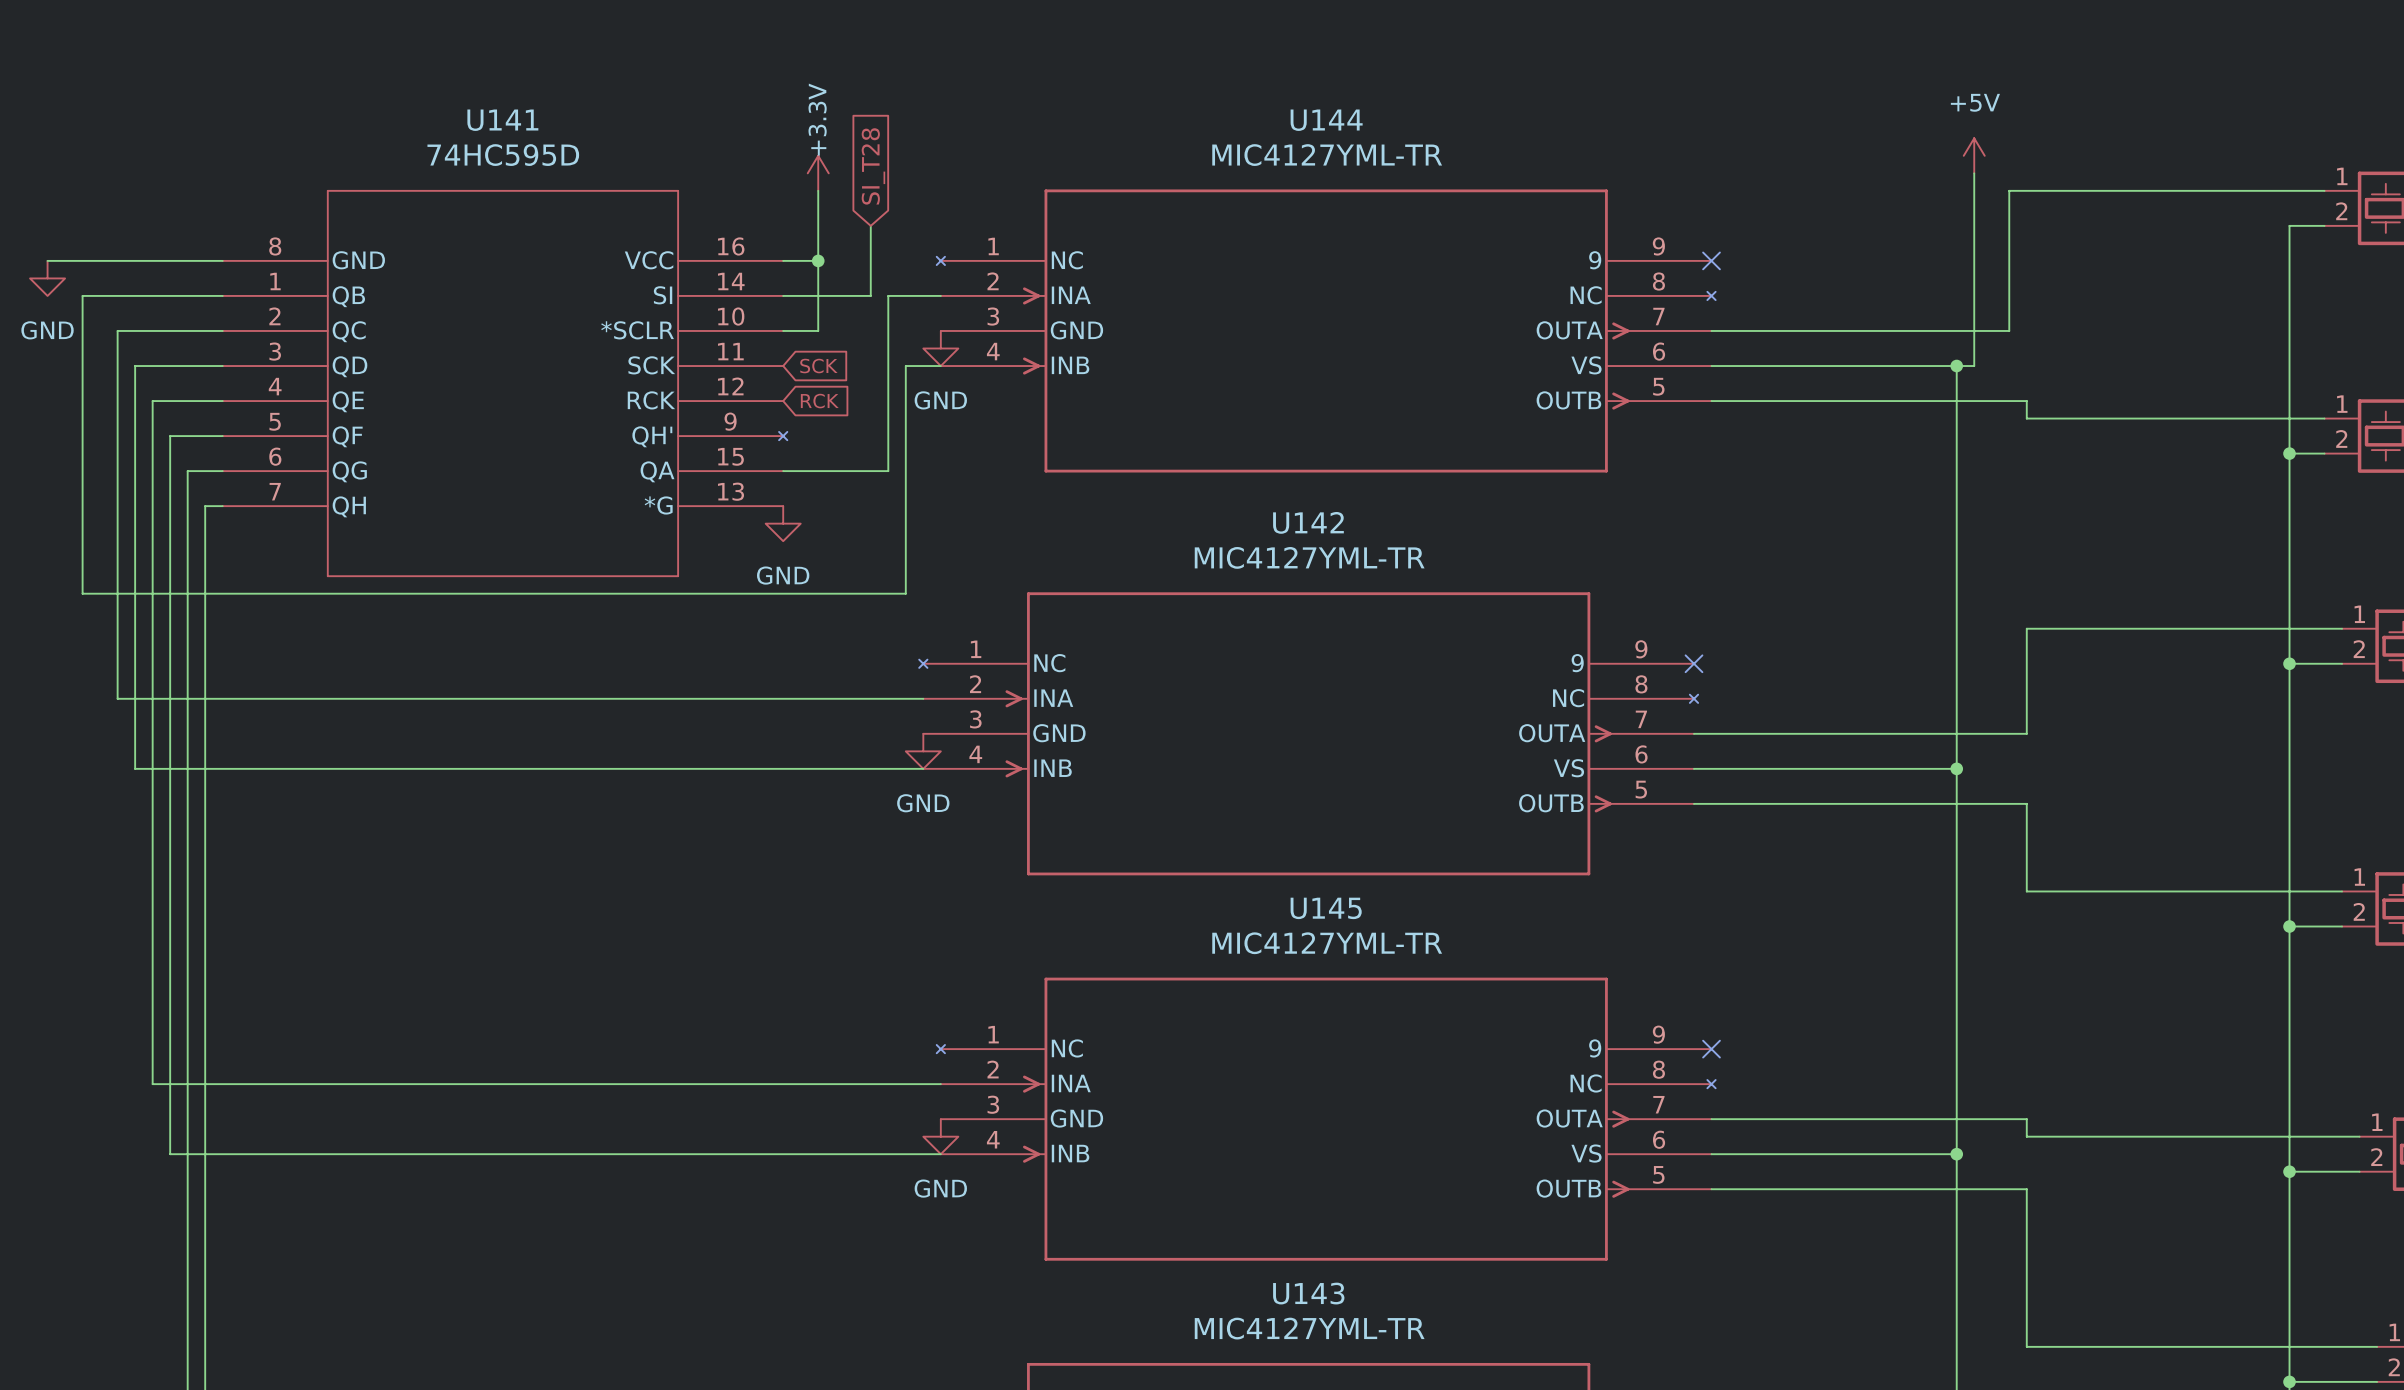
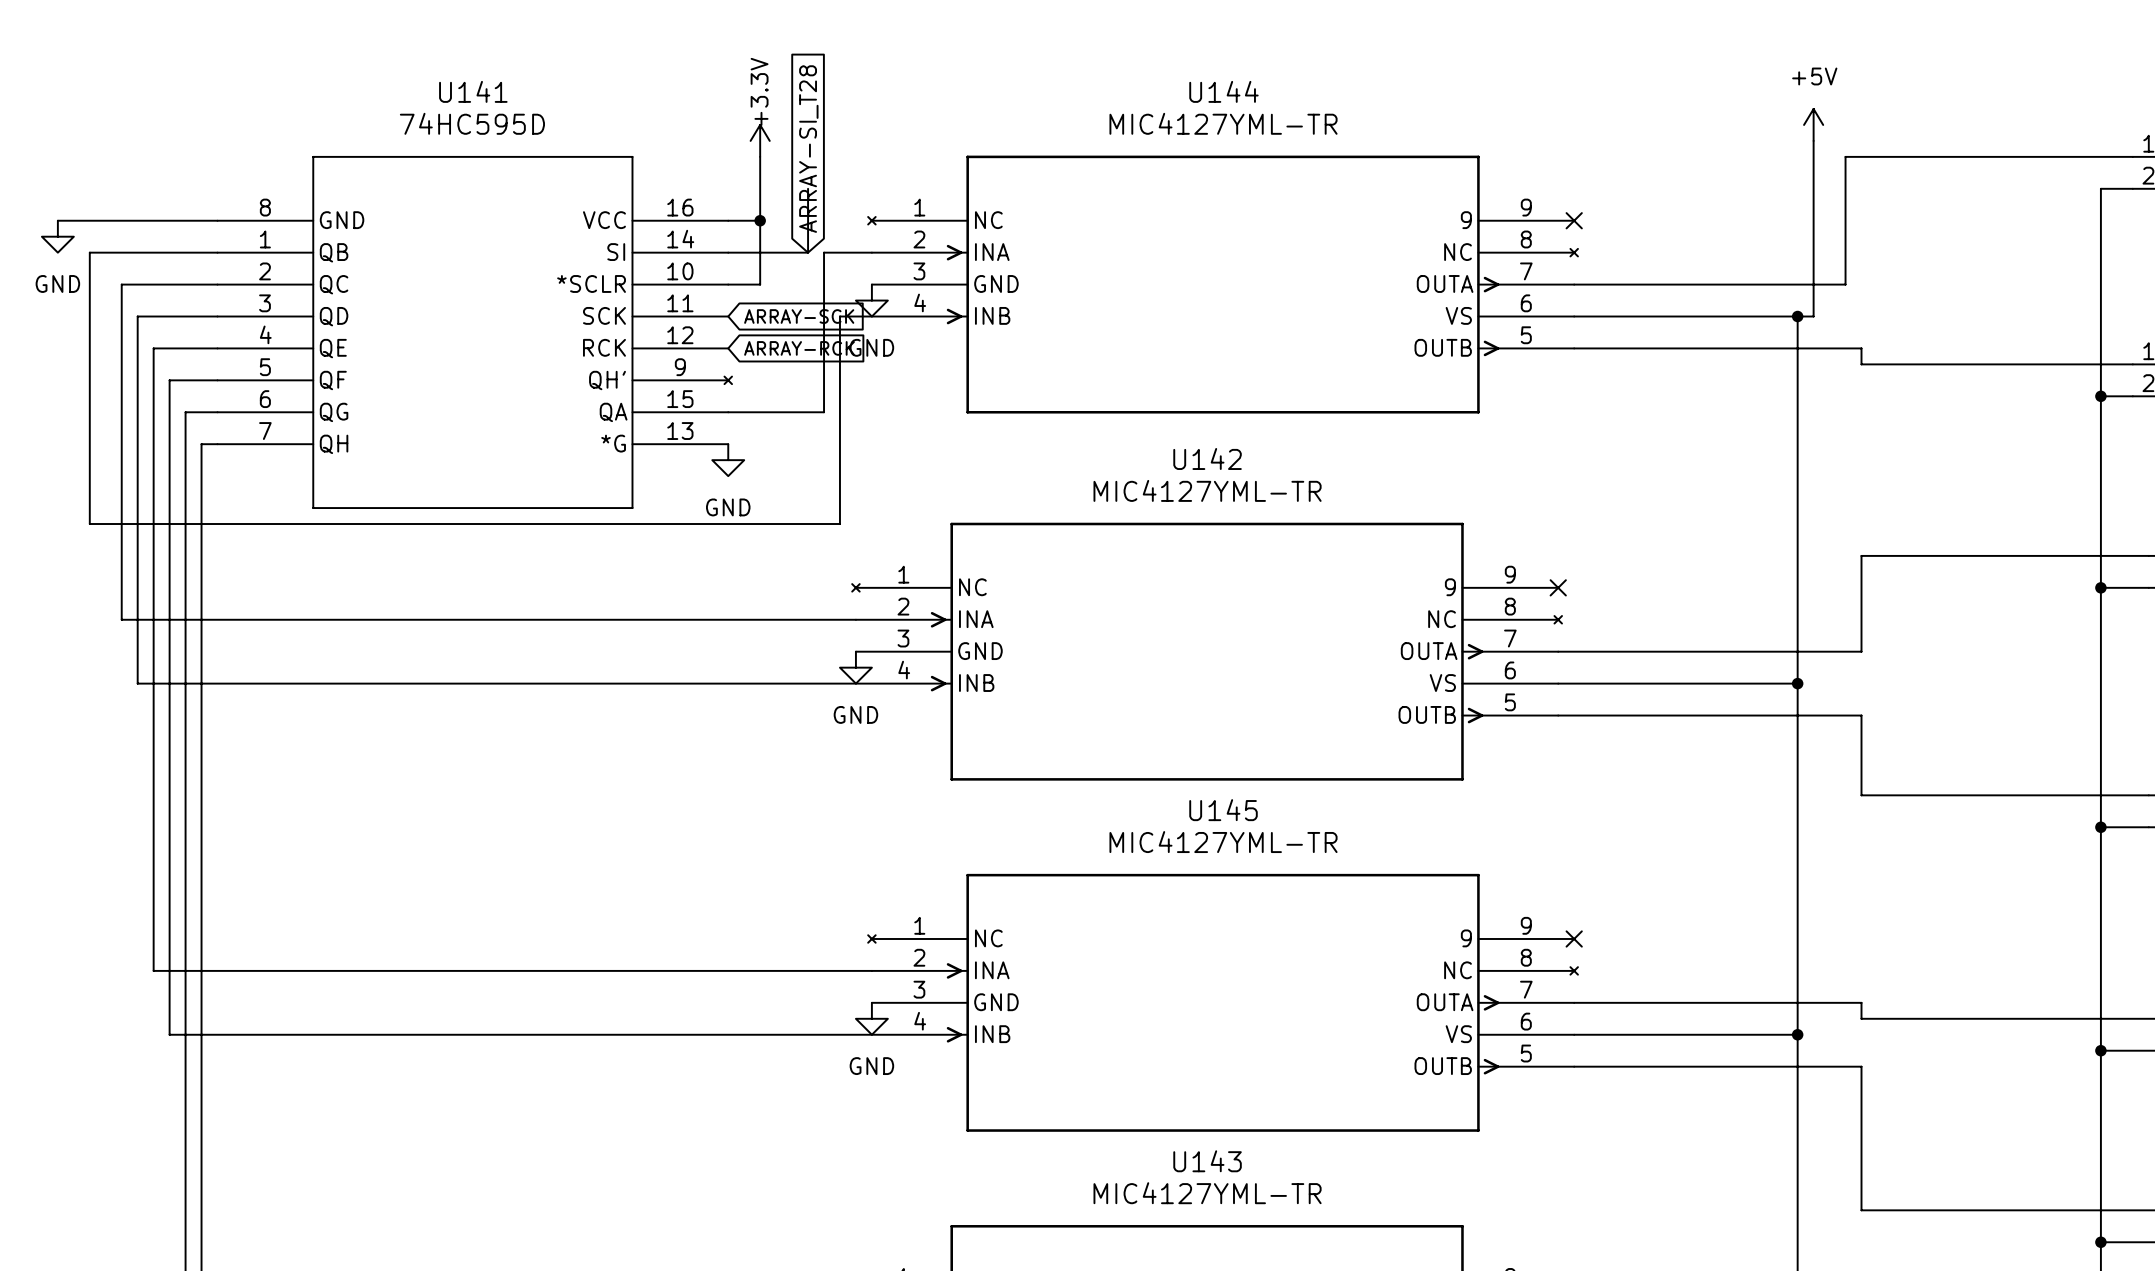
global label: SI_T28 (873, 166) -> ARRAY-SI_T28 (808, 149)
global label: SCK (818, 366) -> ARRAY-SCK (799, 316)
global label: RCK (819, 401) -> ARRAY-RCK (799, 348)

